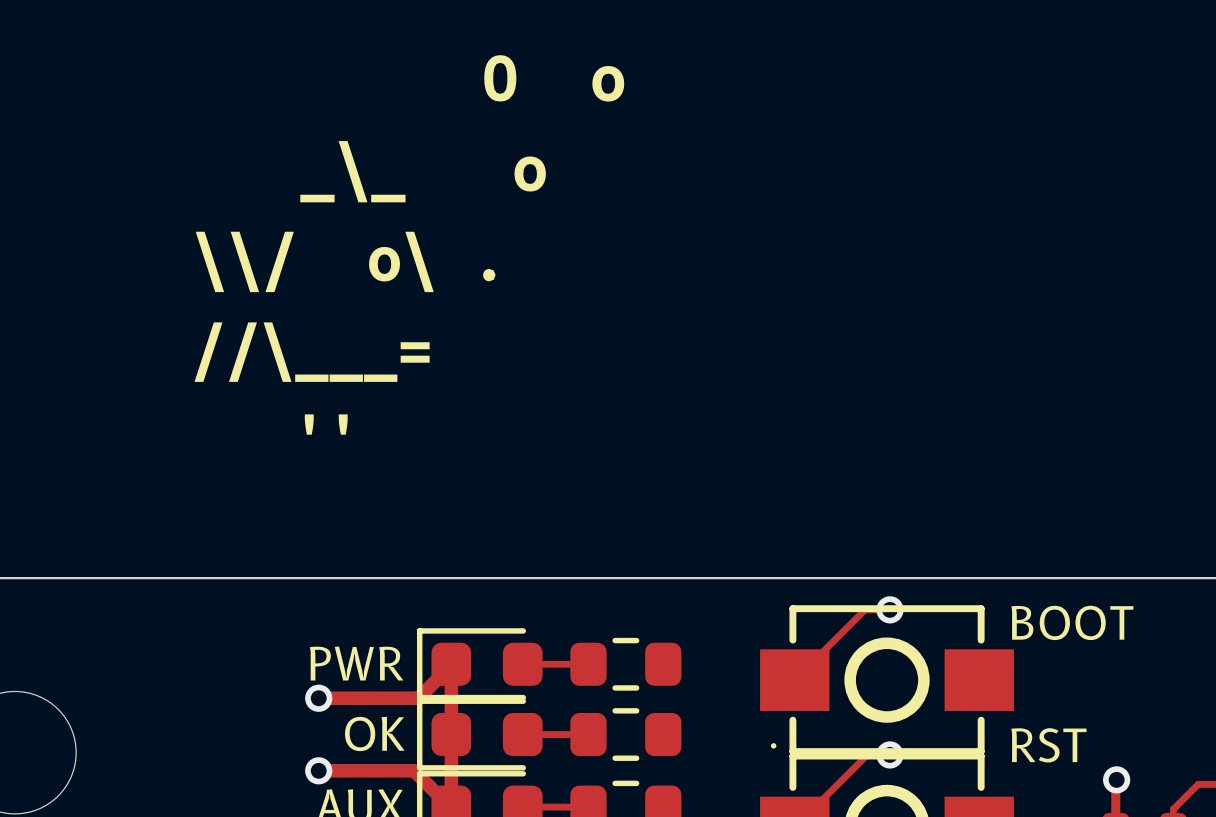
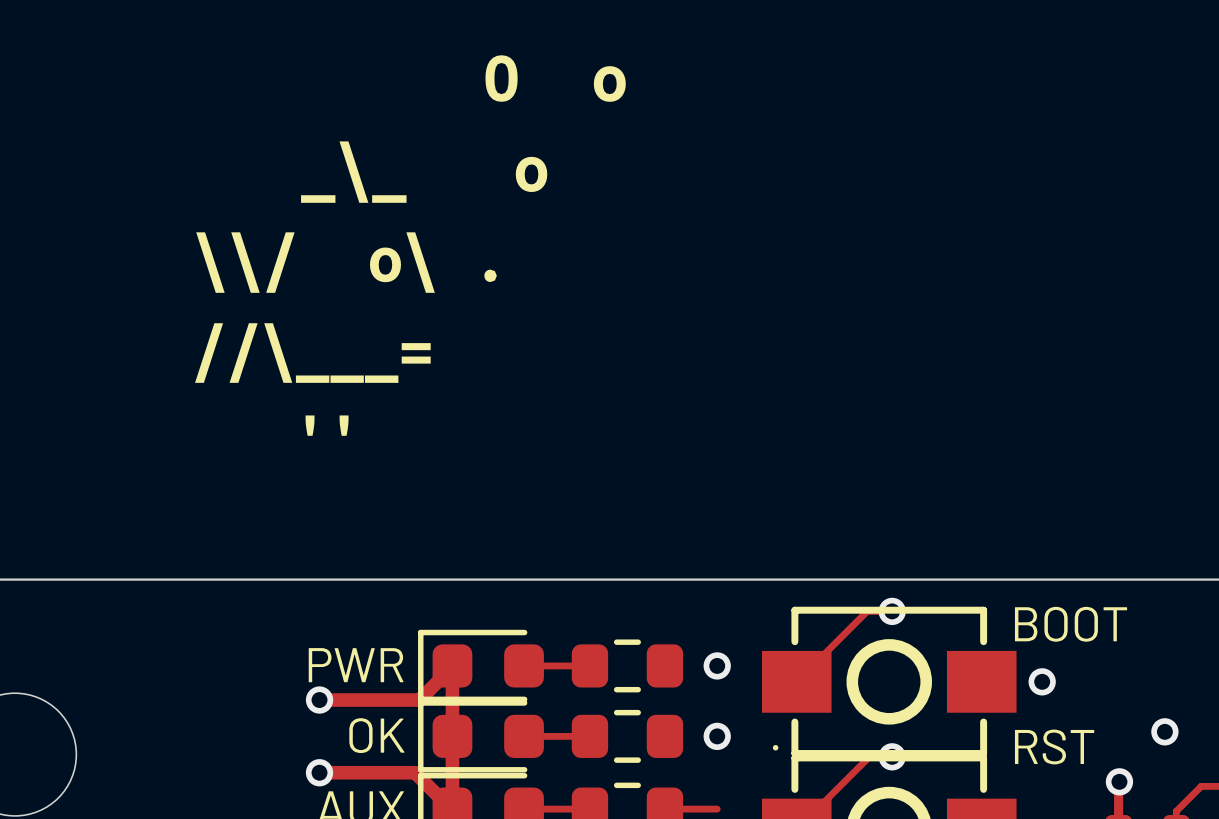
via: none -> (717, 665)
via: none -> (1042, 681)
via: none -> (1164, 731)
via: none -> (717, 736)
track: none -> (664, 809) (717, 809)

